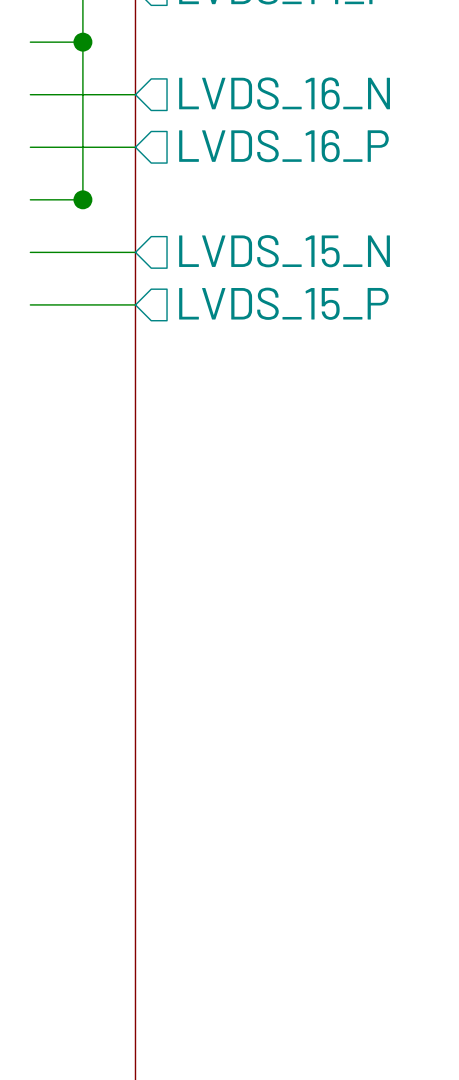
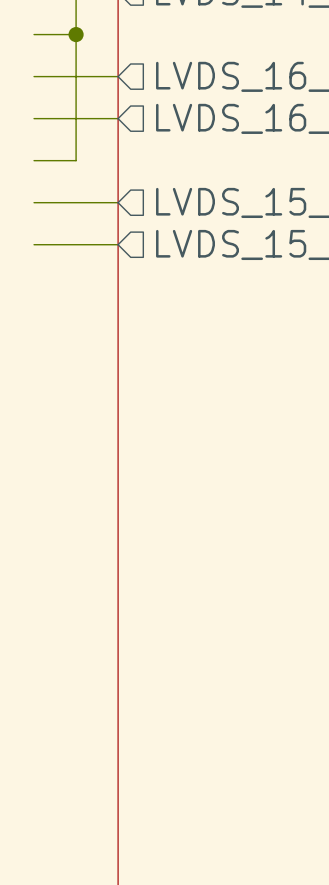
junction: (82, 199) -> none

